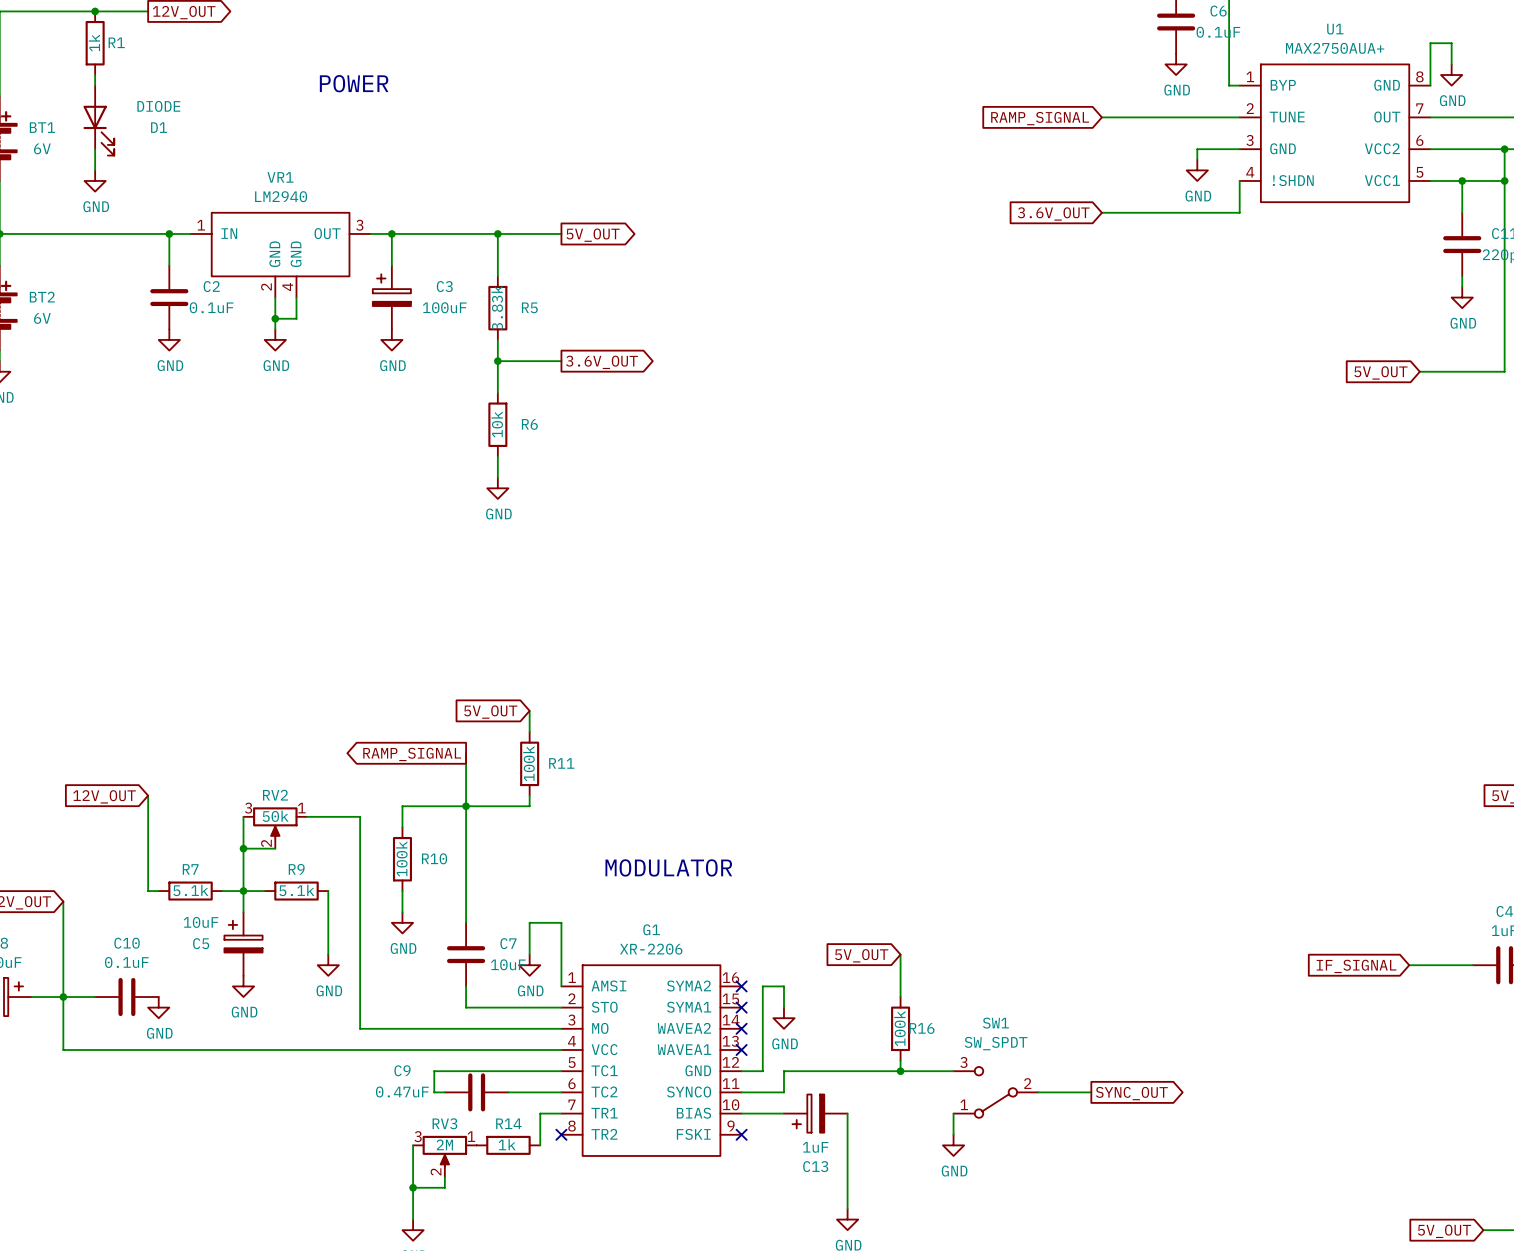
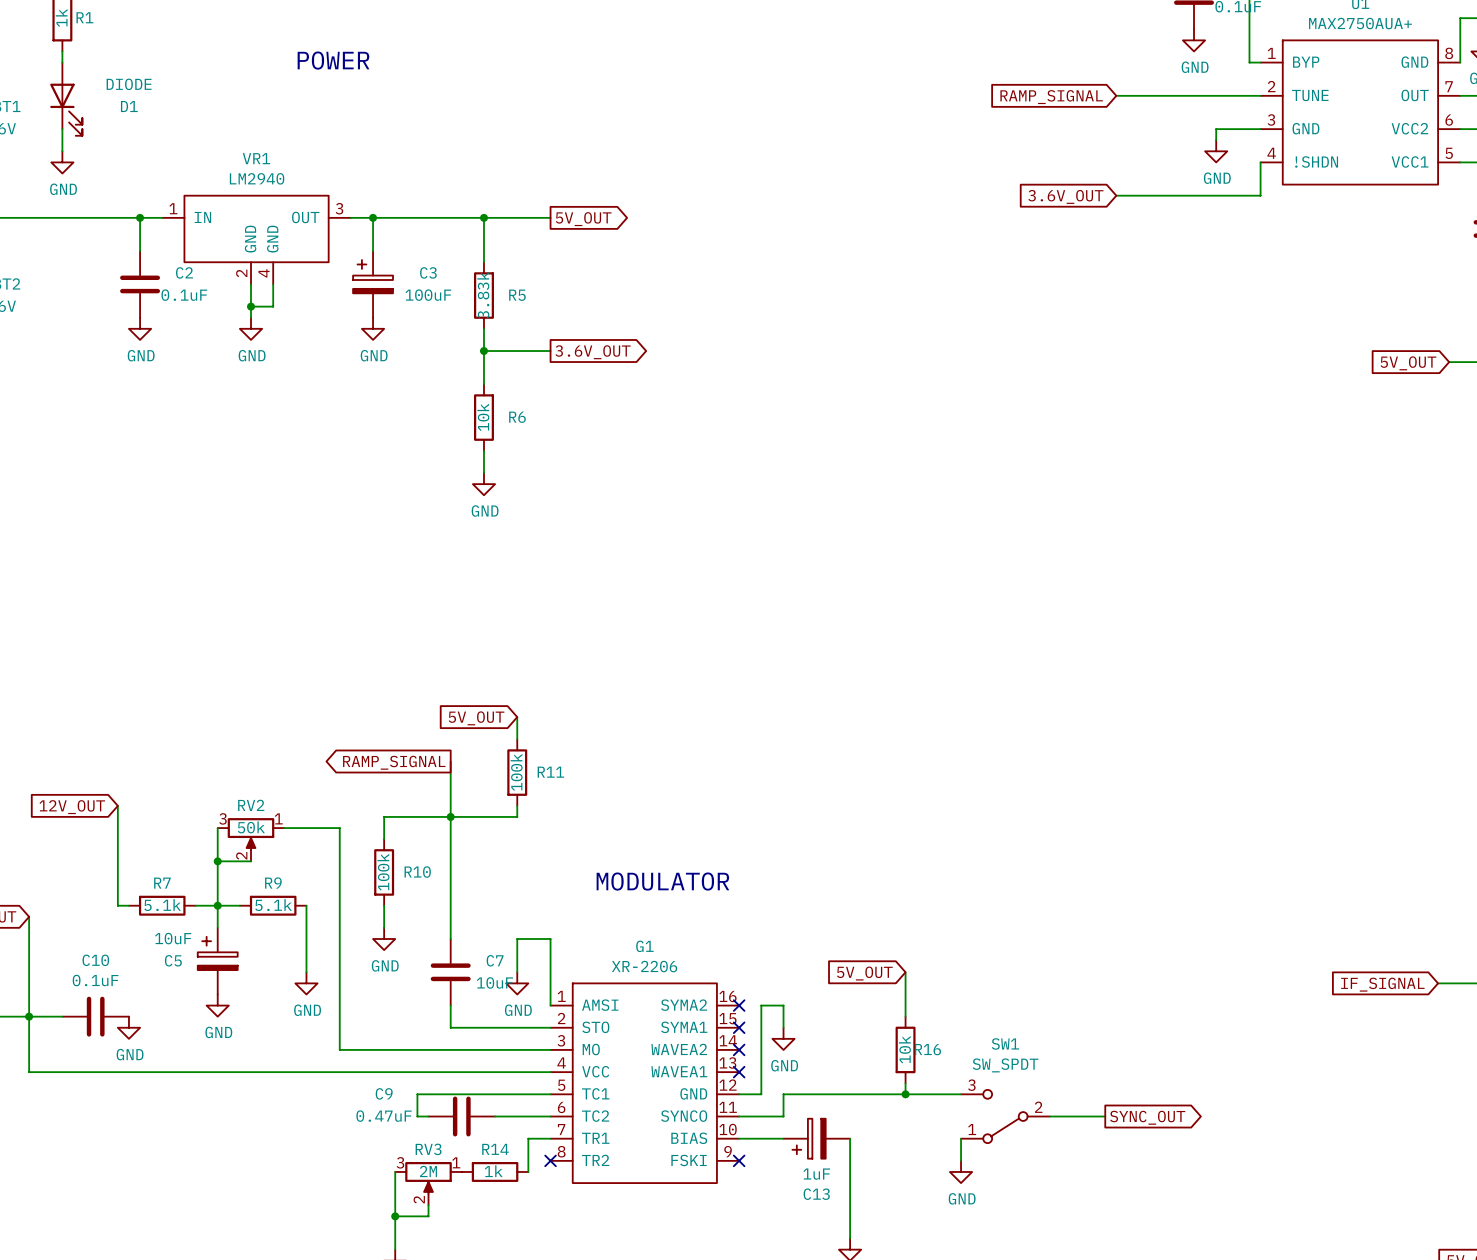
R16 value: 100k (899, 1028) -> 10k (904, 1049)

